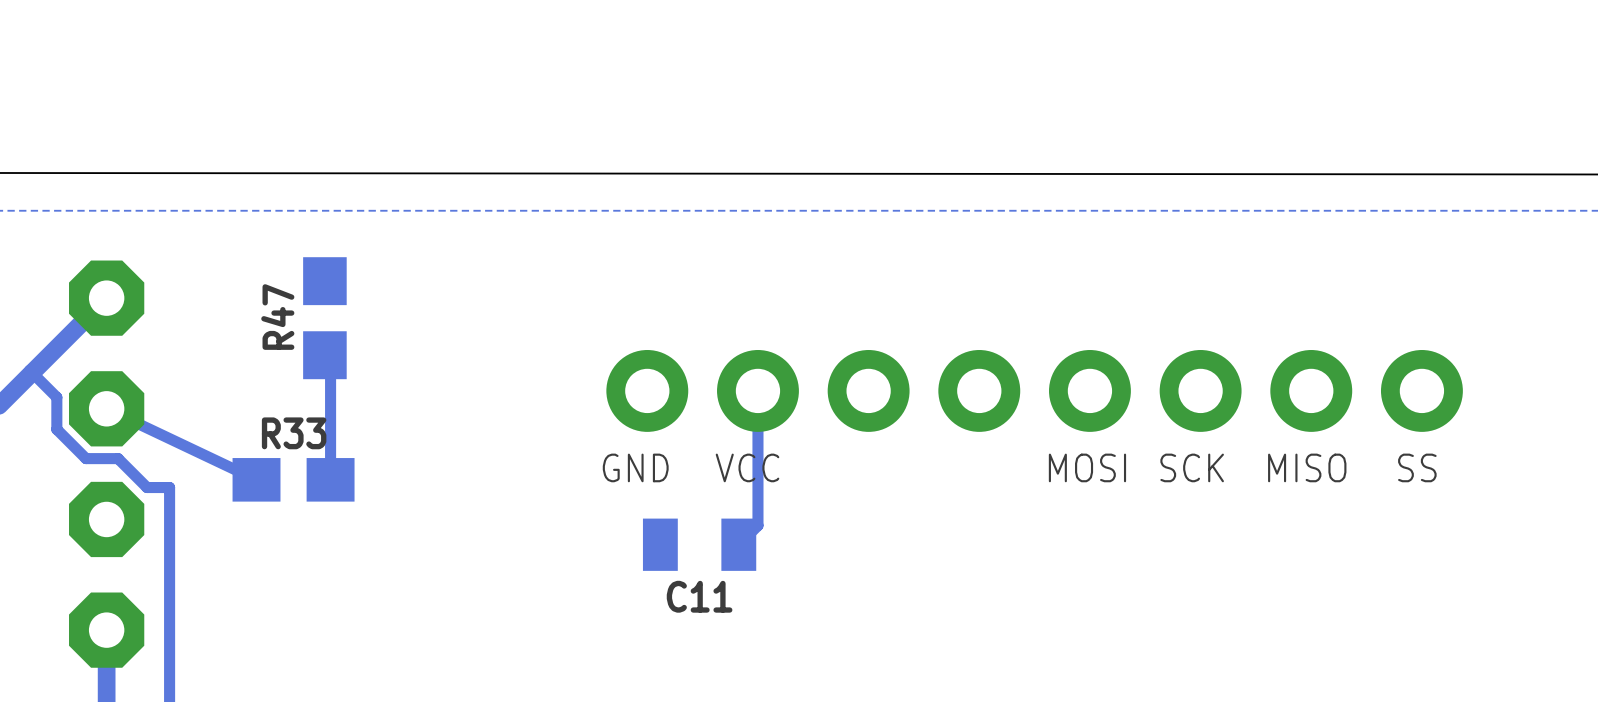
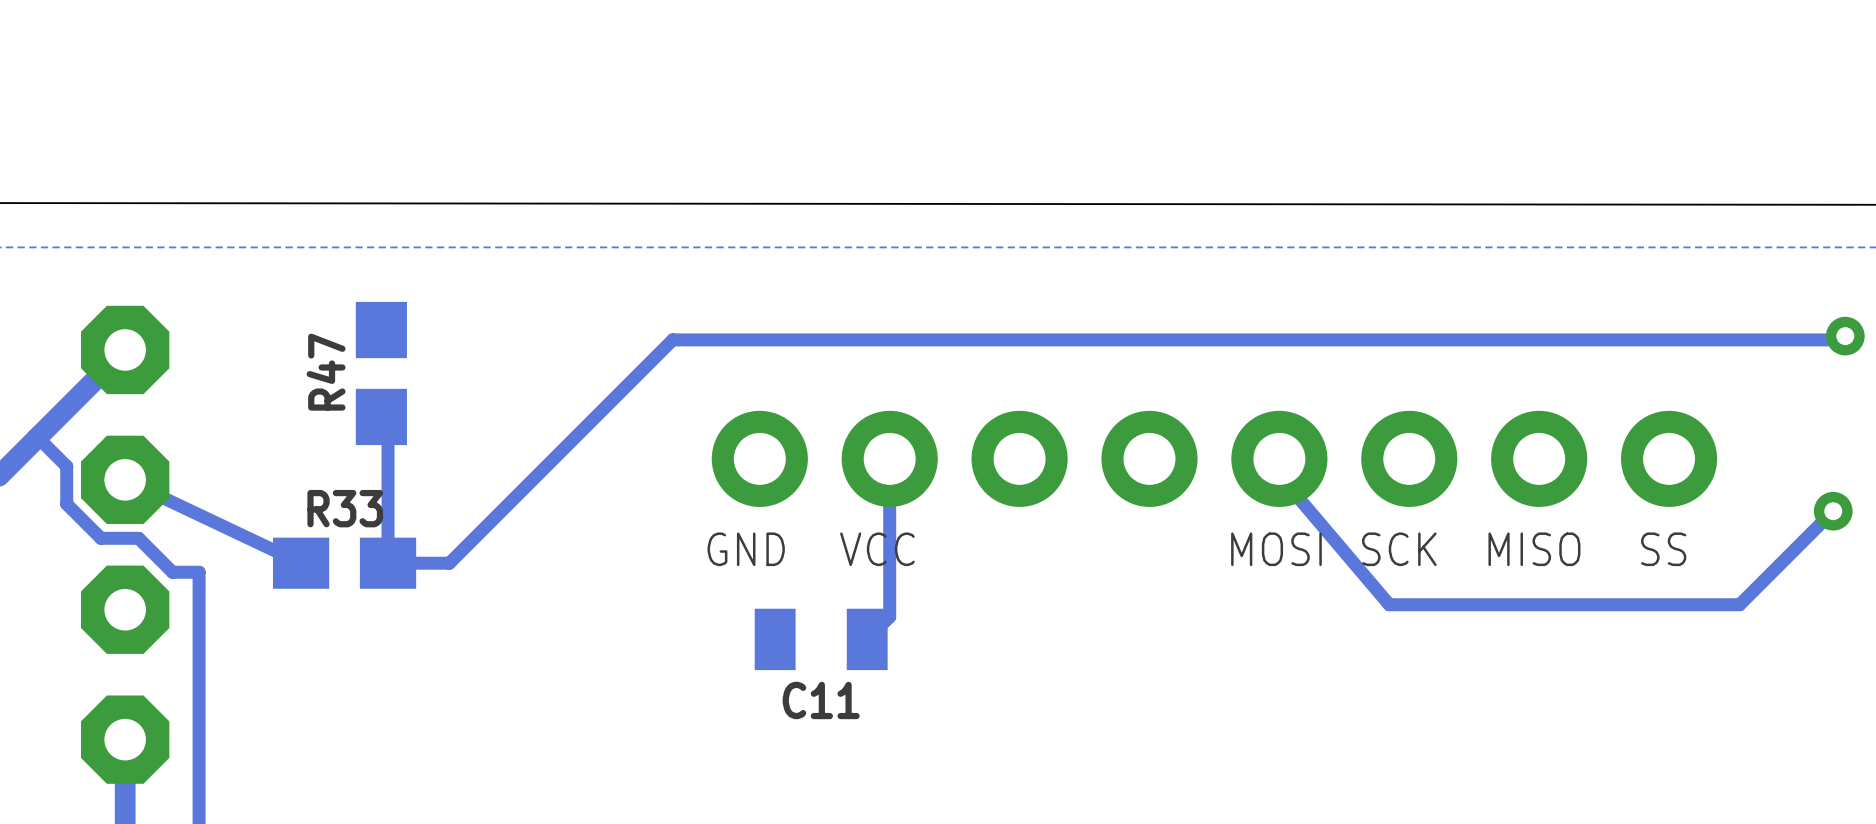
track: none -> (1845, 336) (1841, 339) (672, 339) (449, 563) (388, 563)
via: none -> (1845, 336)
track: none -> (1279, 458) (1279, 475) (1389, 604) (1739, 604) (1833, 511)
via: none -> (1833, 511)

